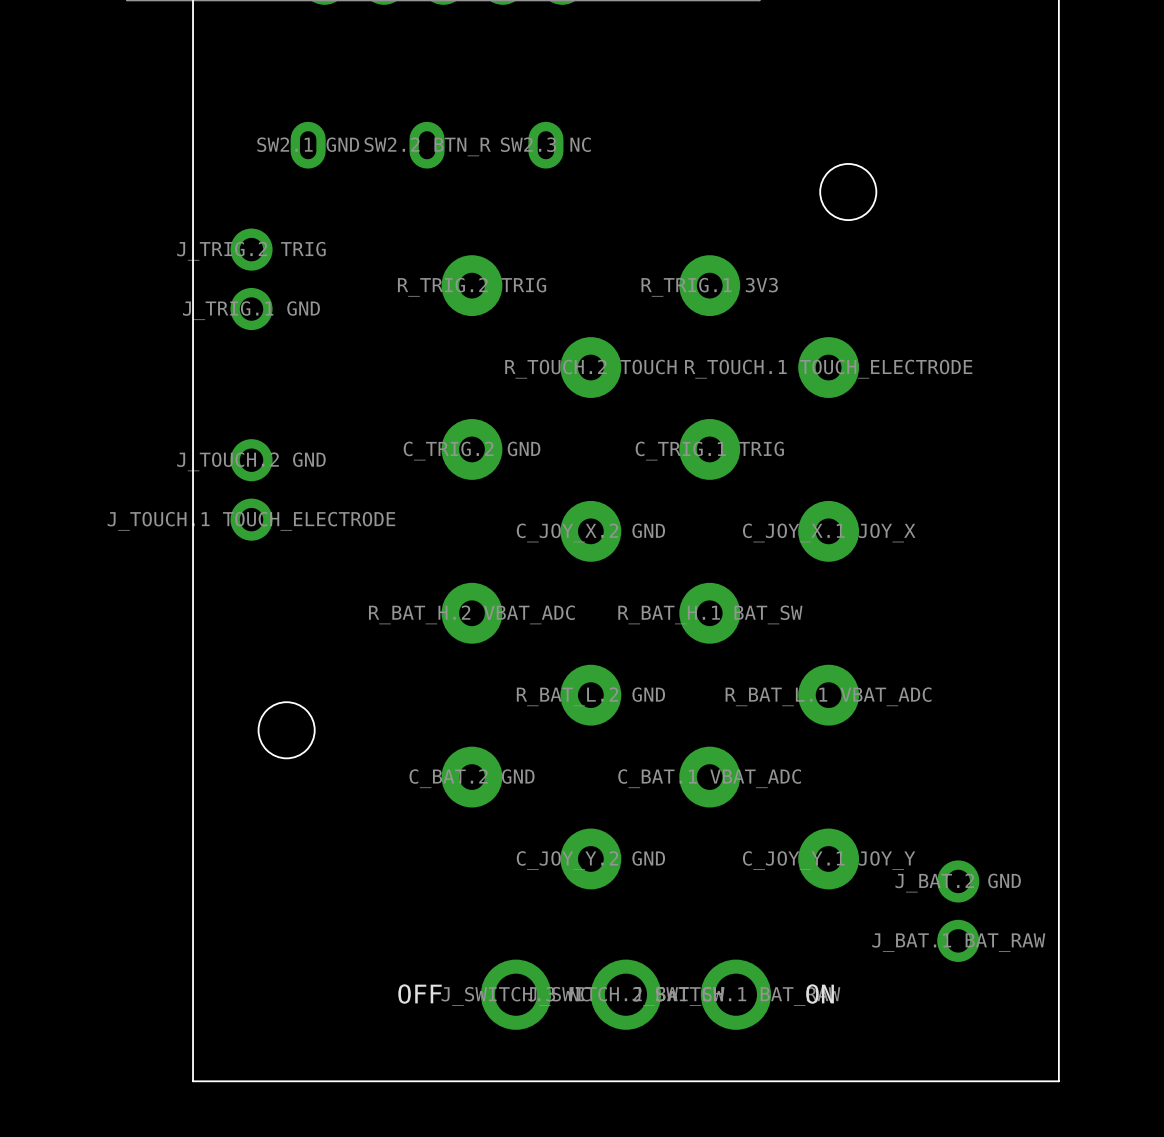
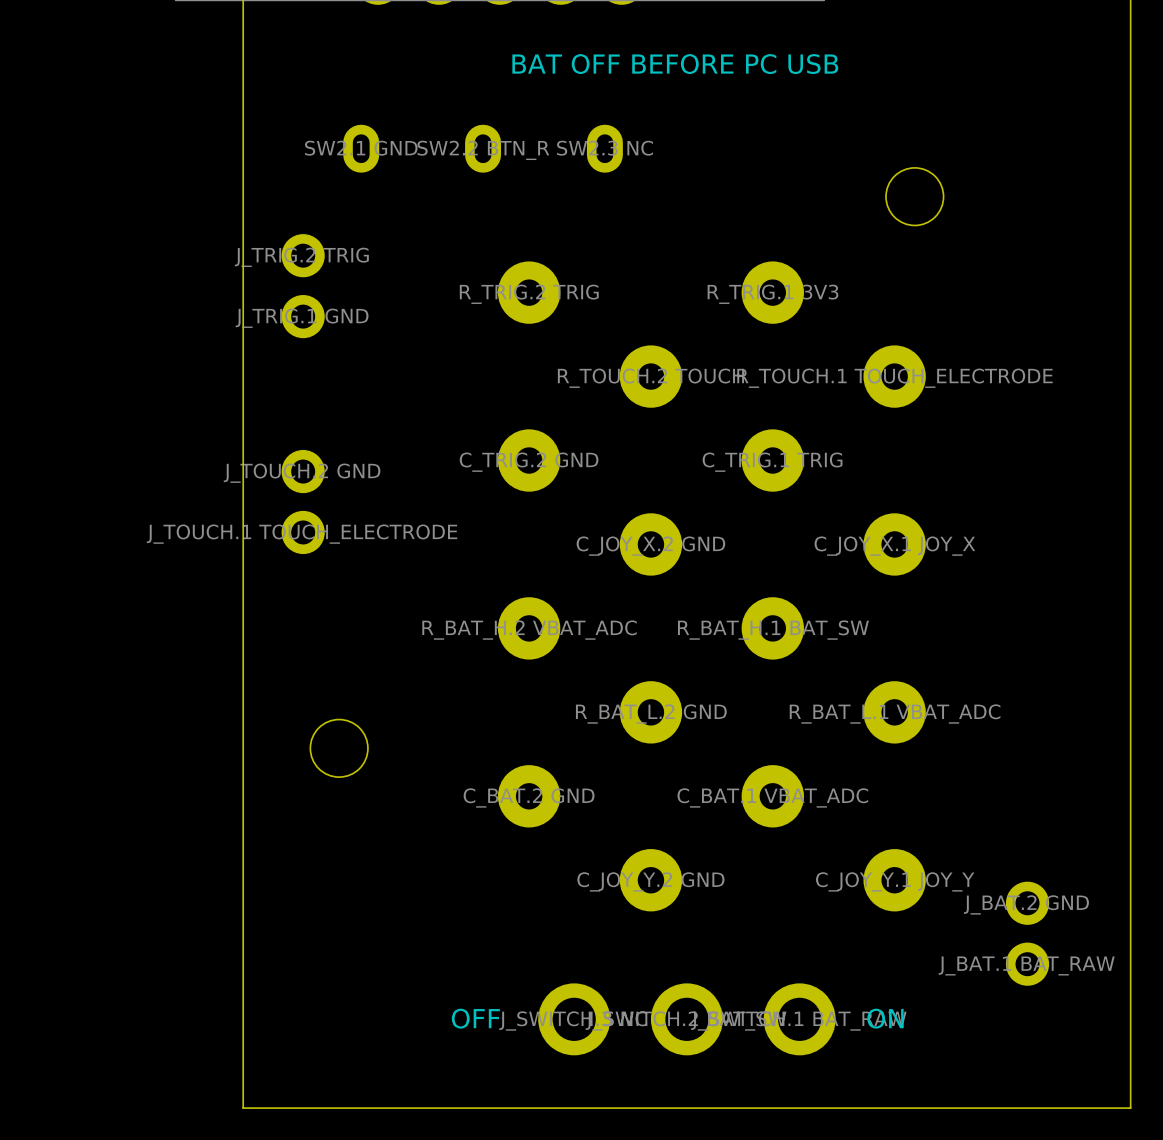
text: none -> BAT OFF BEFORE PC USB (675, 64)

